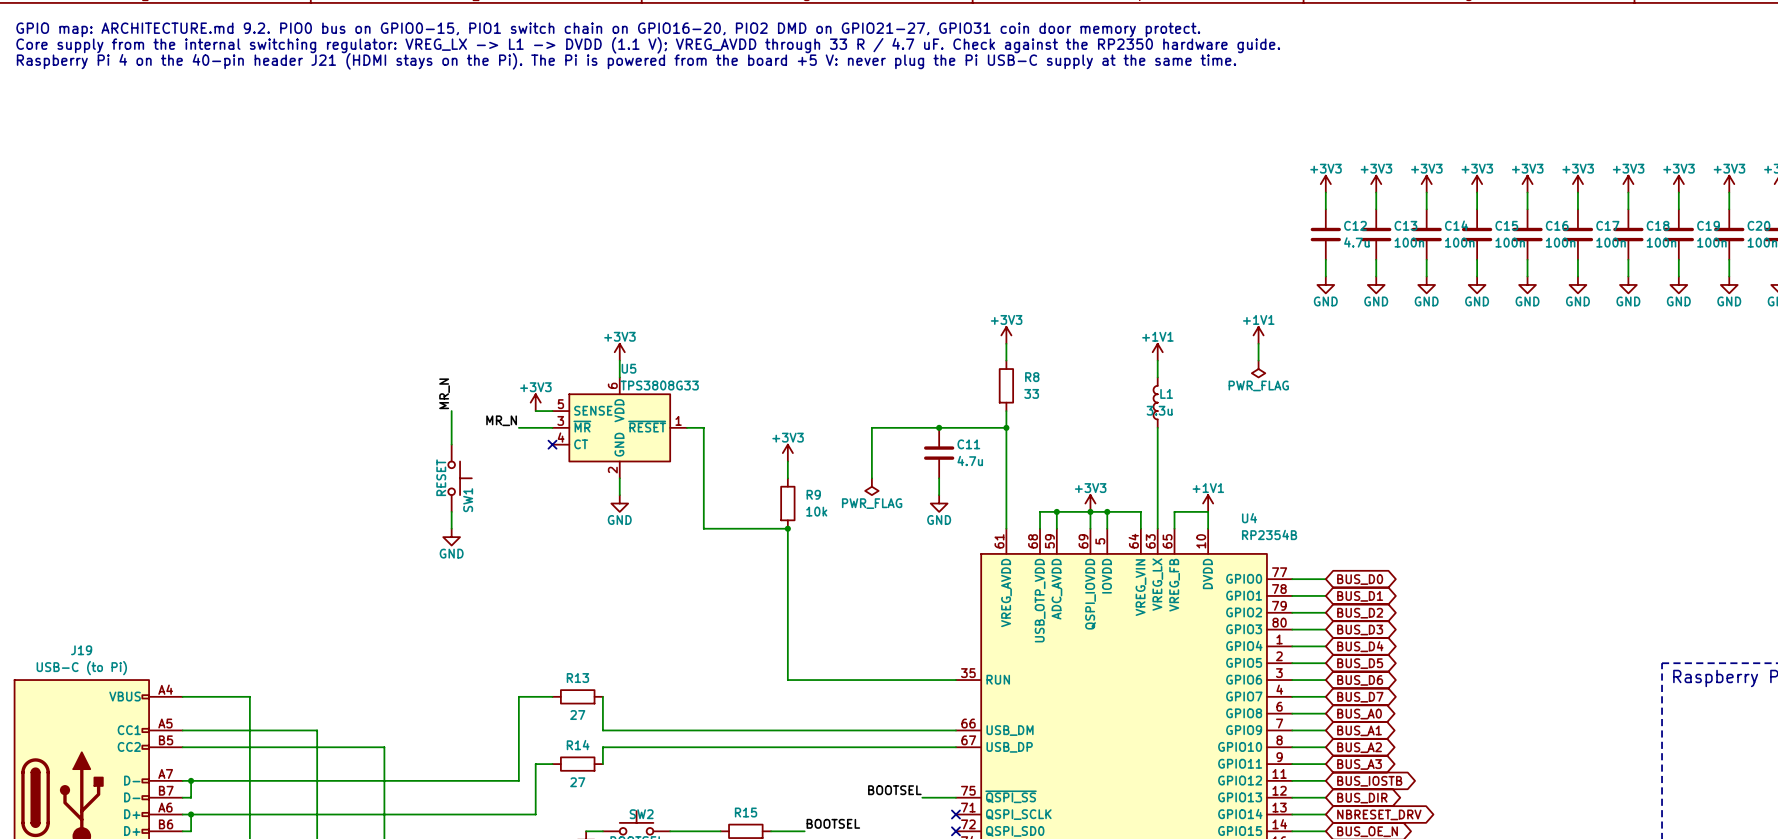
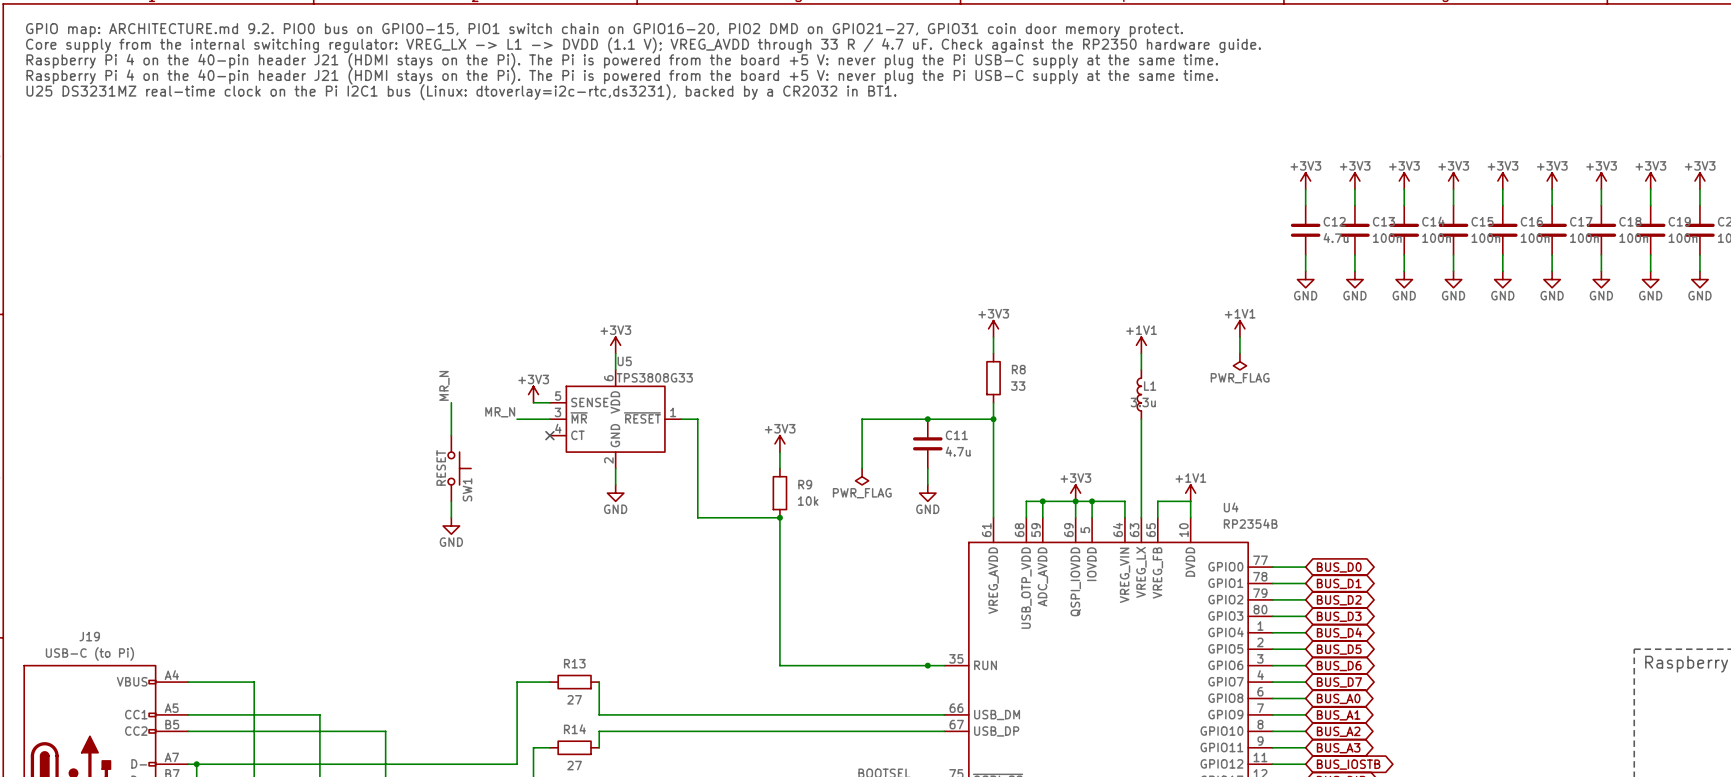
text: none -> Raspberry Pi 4 on the 40-pin header J21 (HDMI stays on the Pi). The Pi is powered from the board +5 V: never plug the Pi USB-C supply at the same time. (622, 76)
text: none -> U25 DS3231MZ real-time clock on the Pi I2C1 bus (Linux: dtoverlay=i2c-rtc,ds3231), backed by a CR2032 in BT1. (461, 92)
junction: none -> (927, 665)

